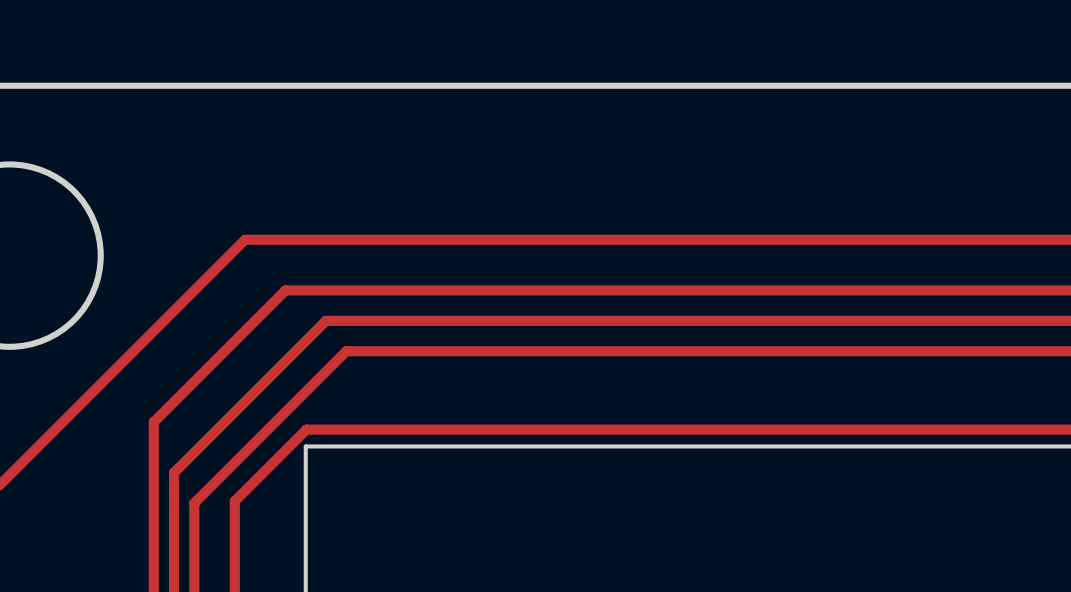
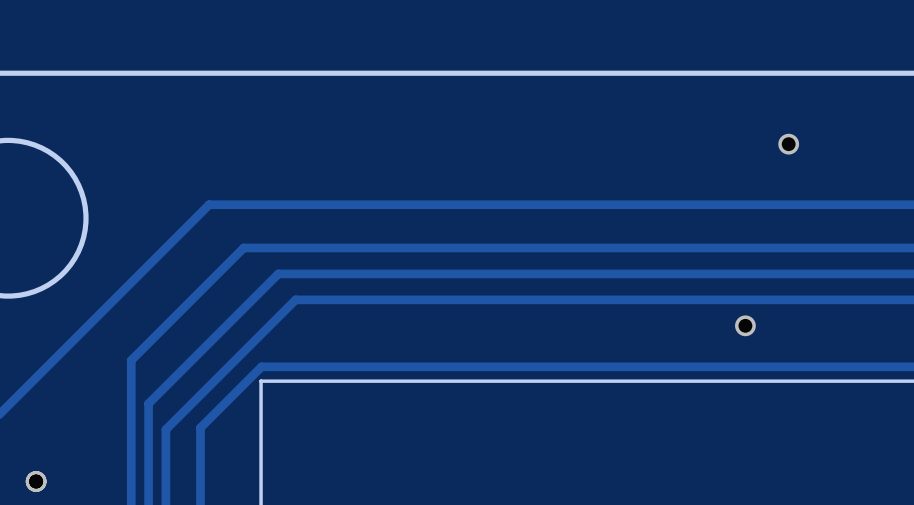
via: none -> (788, 144)
via: none -> (745, 325)
via: none -> (36, 481)

